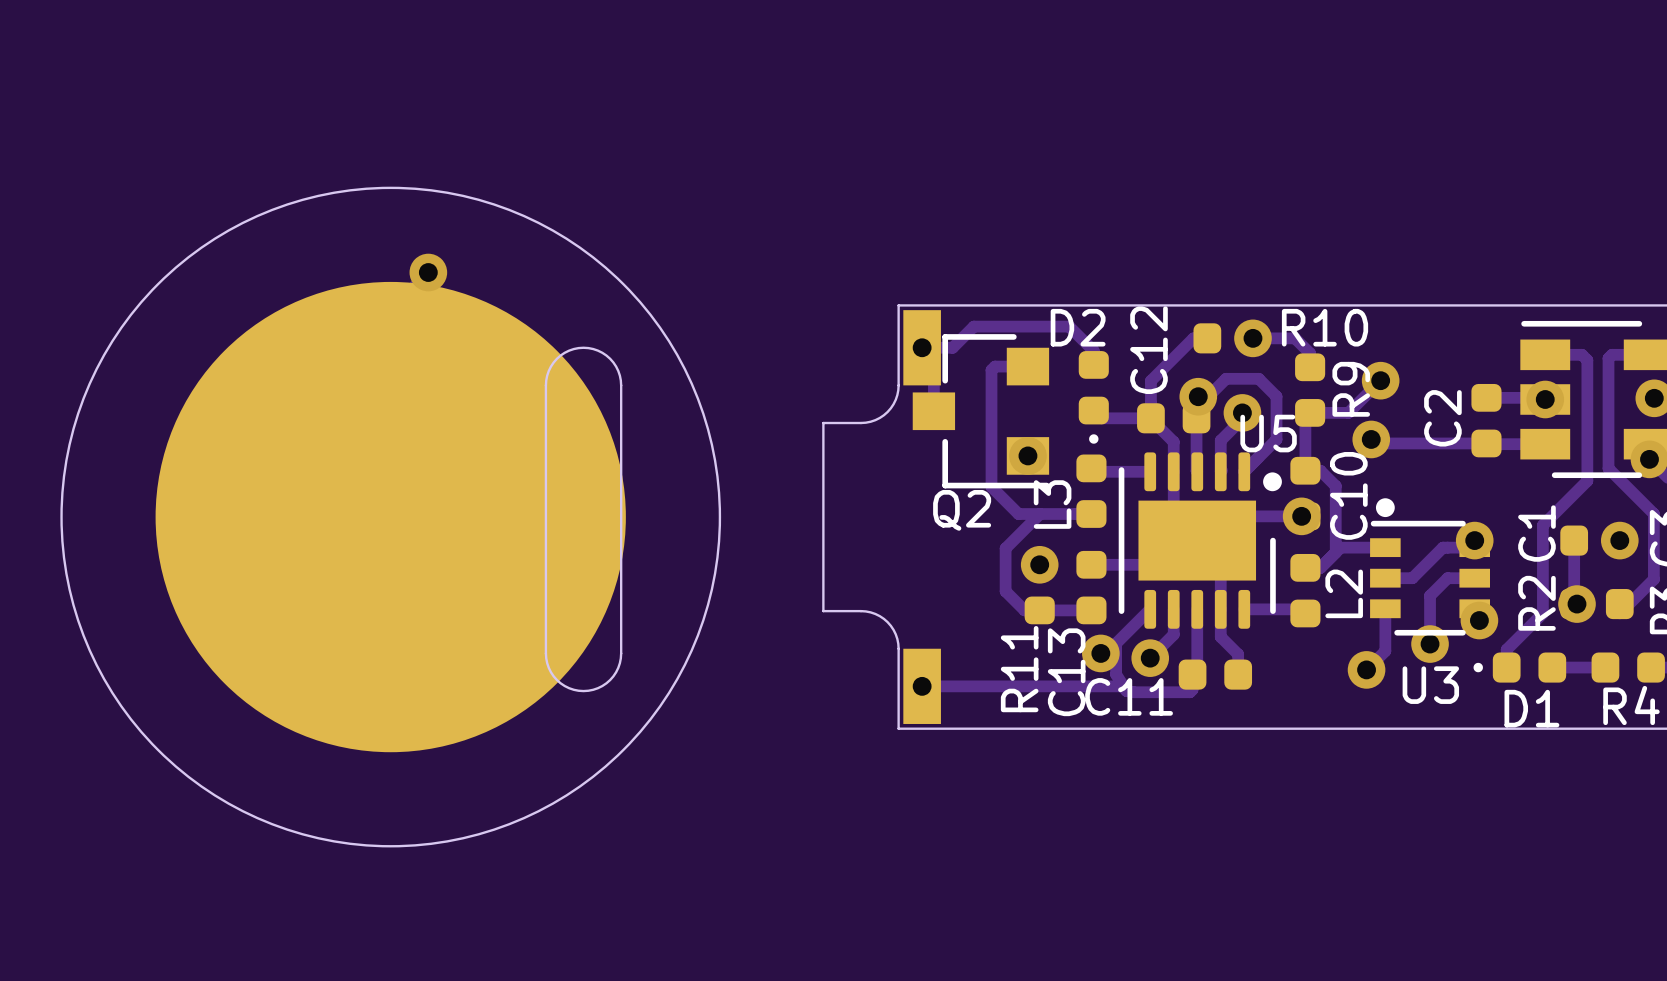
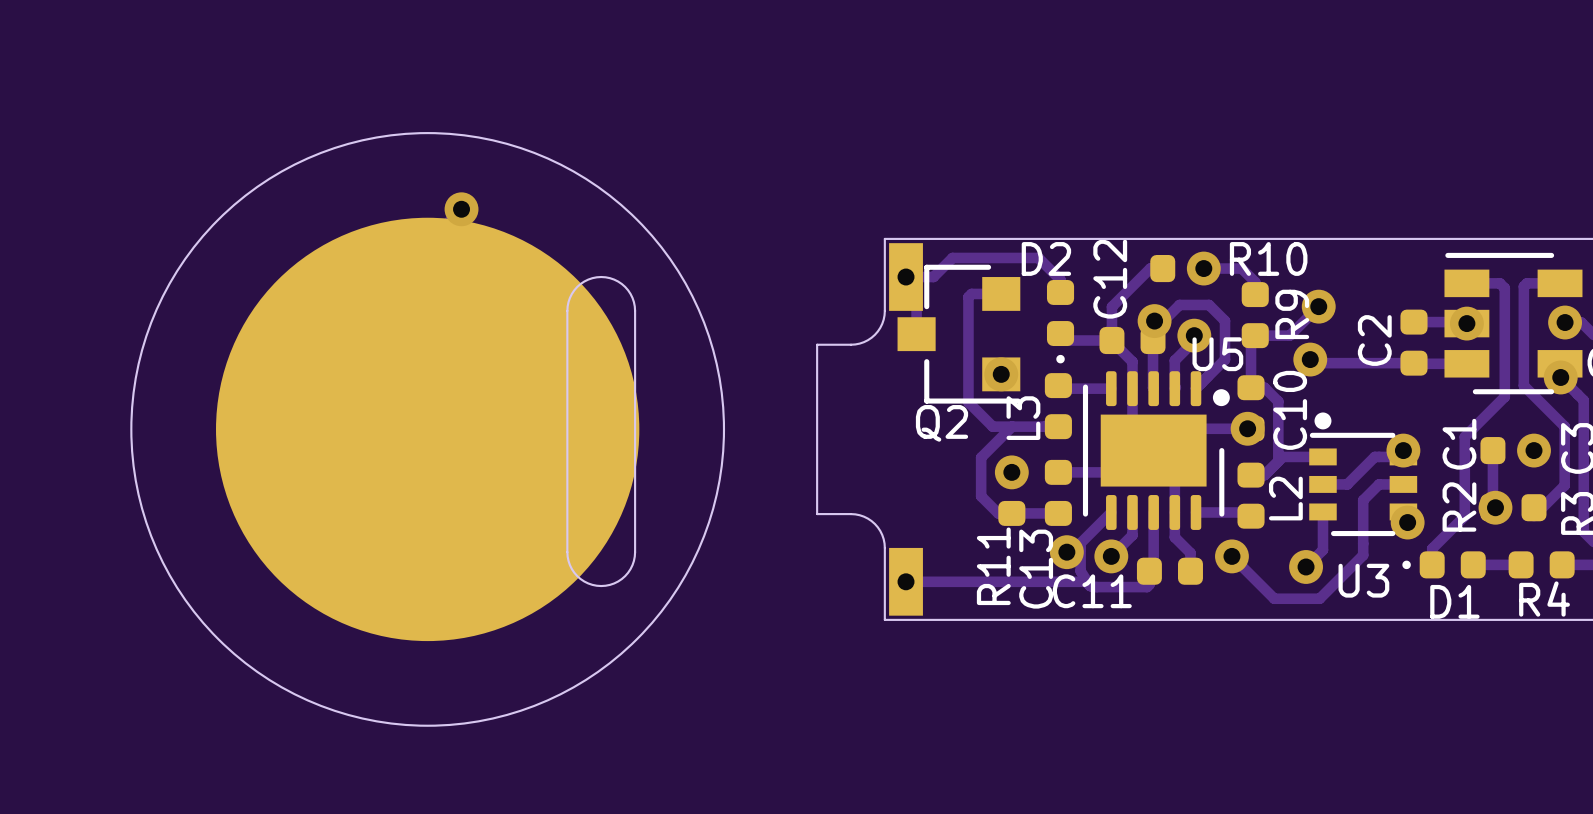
track: none -> (1363, 543) (1363, 555) (1319, 598) (1274, 598) (1231, 556)
via position: (1430, 644) -> (1231, 556)

